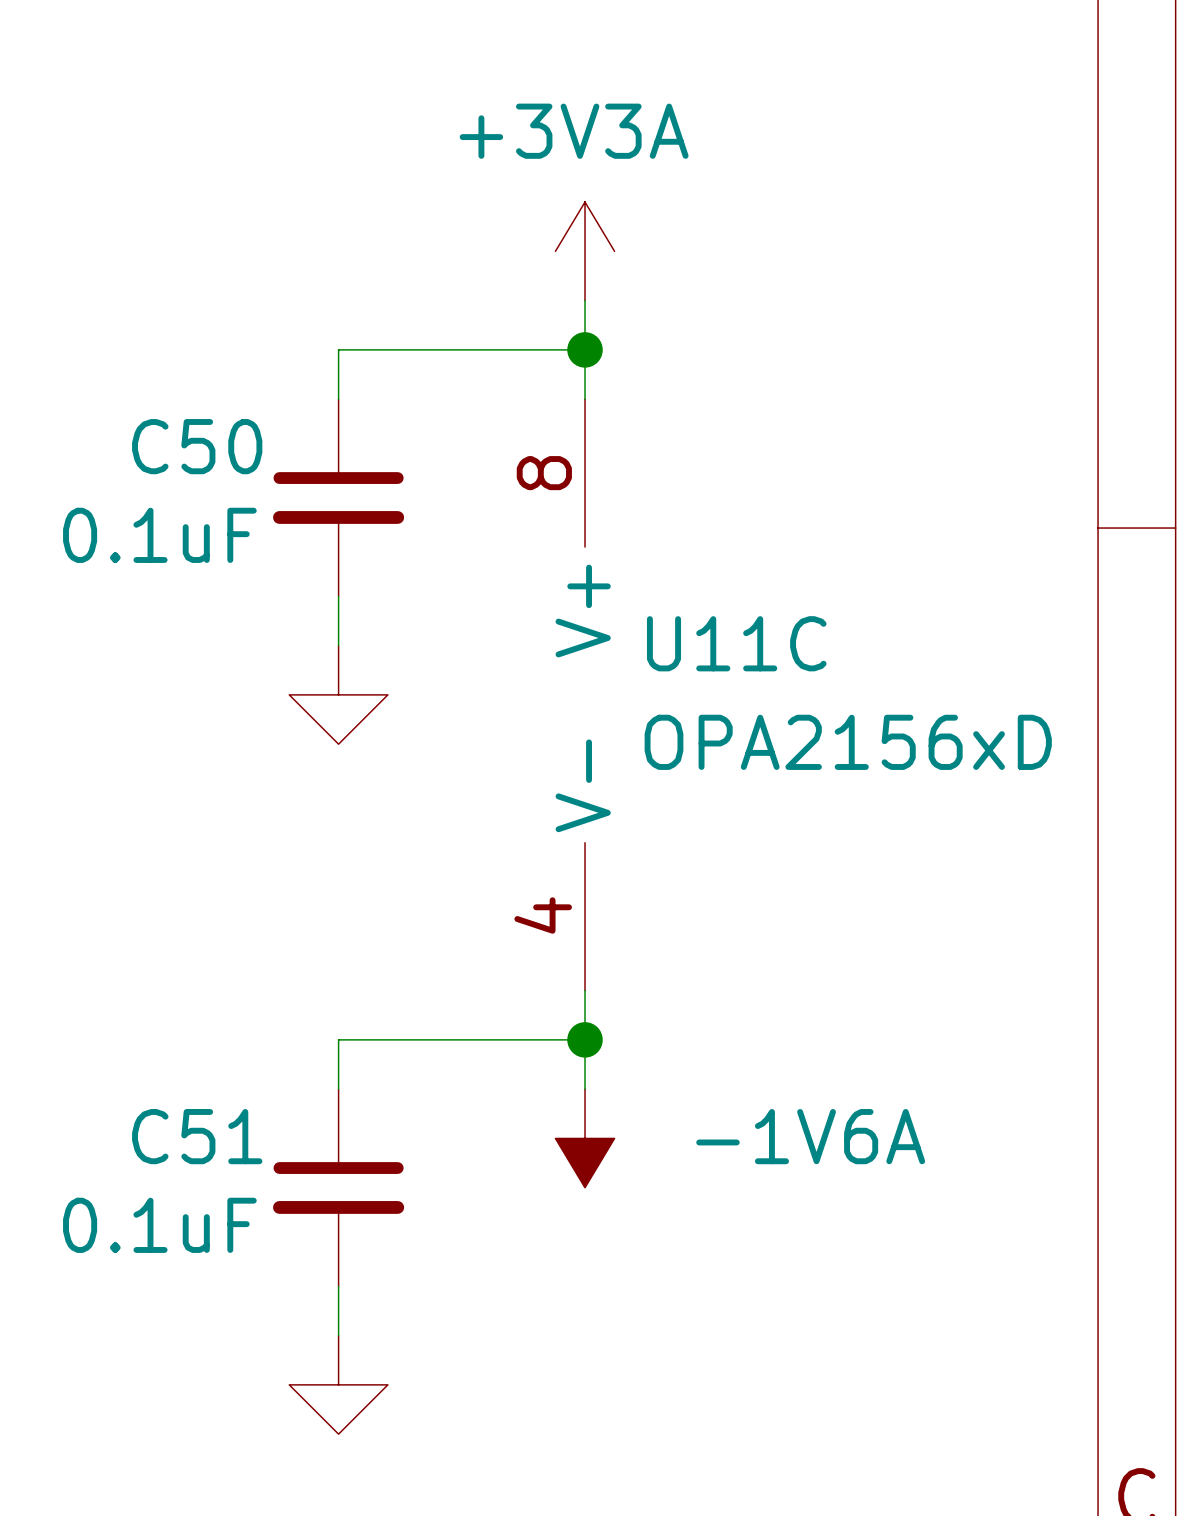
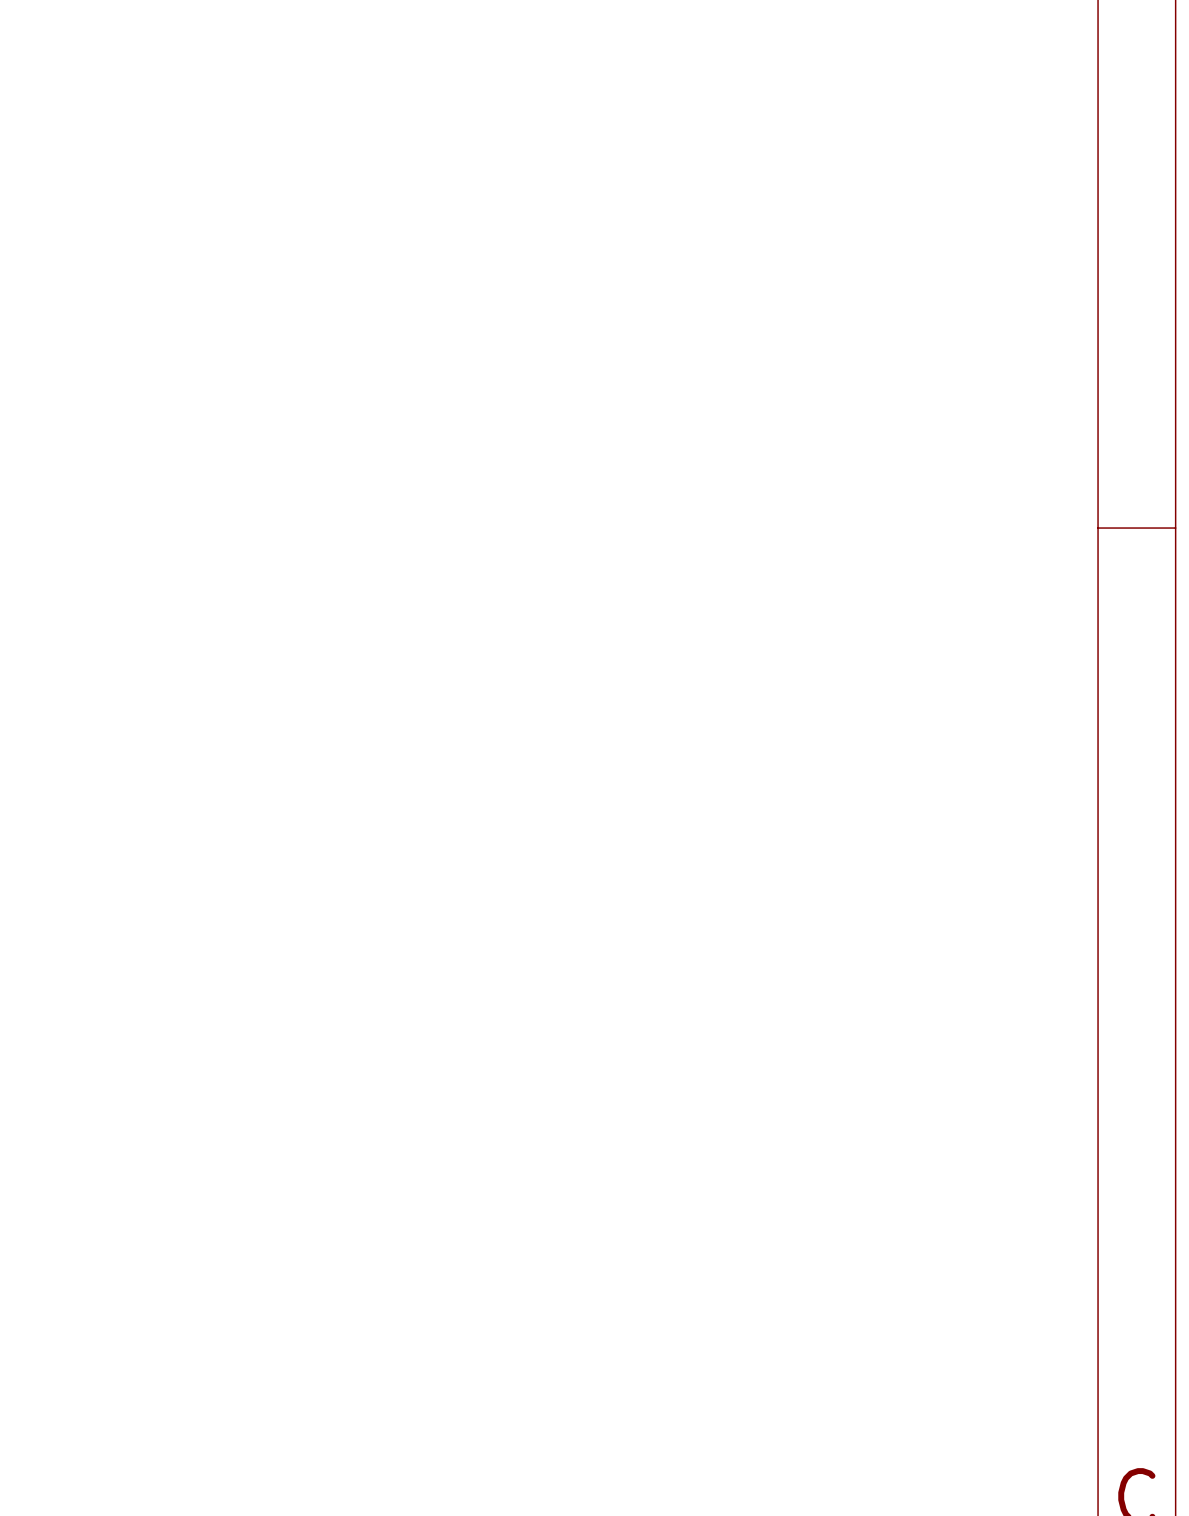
power symbol: +3V3A (585, 251) -> none
wire: (585, 300) (585, 399) -> none
wire: (585, 349) (338, 349) (338, 399) -> none
junction: (585, 349) -> none
C50: 0.1uF (338, 497) -> none
wire: (338, 596) (338, 645) -> none
power symbol: (338, 694) -> none
U11C: OPA2156xD (585, 694) -> none
wire: (585, 990) (585, 1089) -> none
wire: (585, 1039) (338, 1039) (338, 1089) -> none
junction: (585, 1039) -> none
power symbol: -1V6A (585, 1138) -> none
C51: 0.1uF (338, 1187) -> none
wire: (338, 1286) (338, 1335) -> none
power symbol: (338, 1384) -> none

